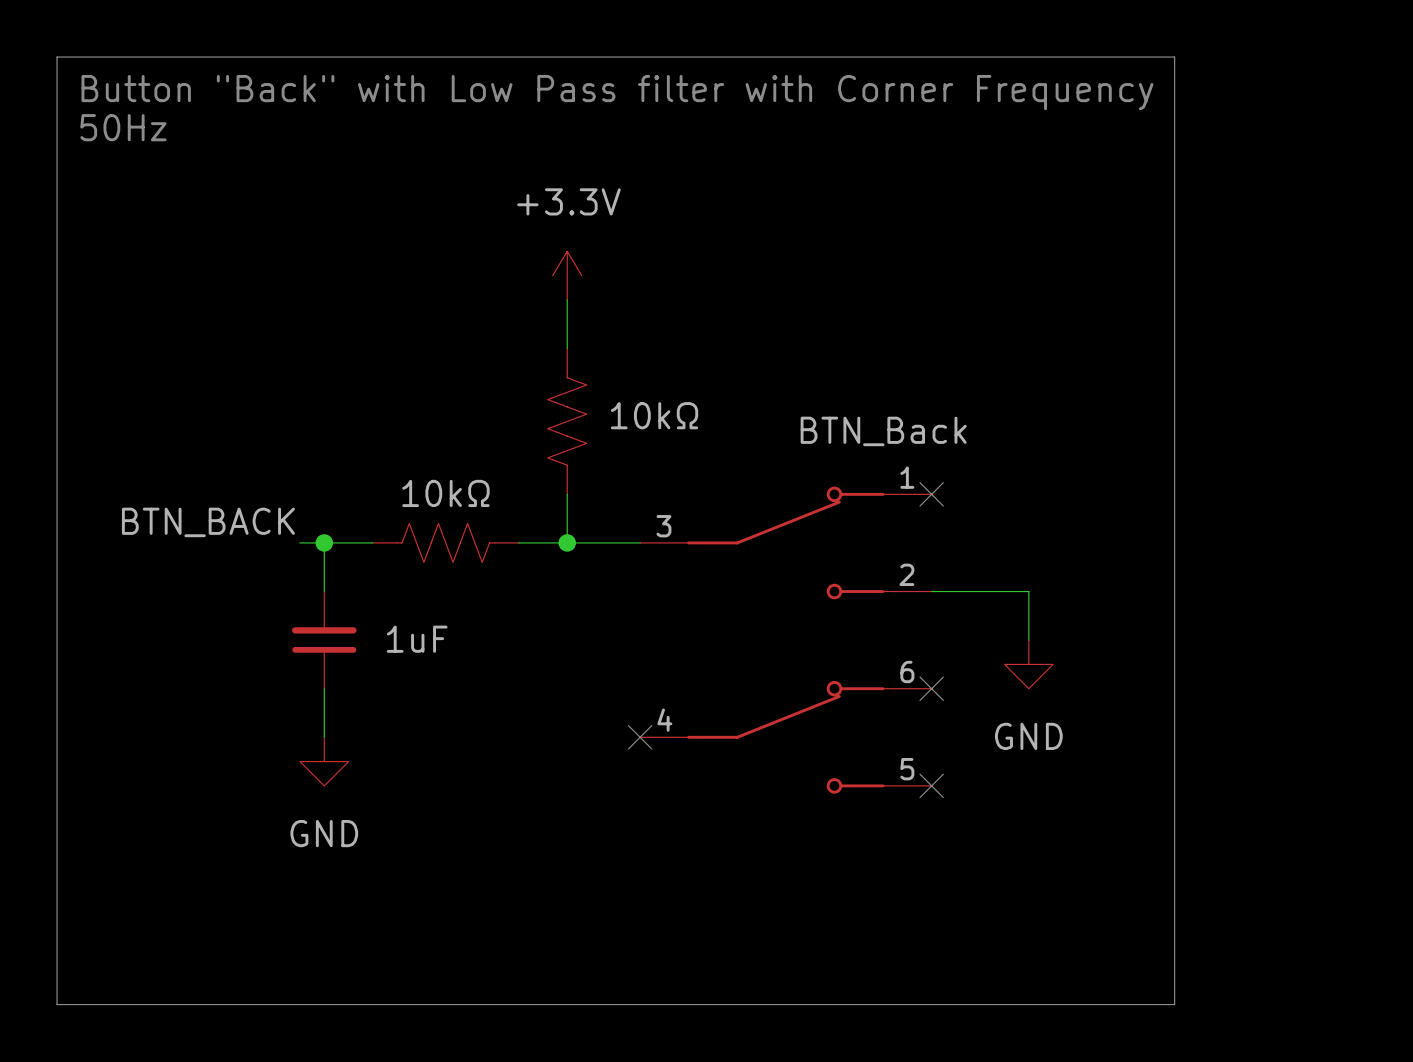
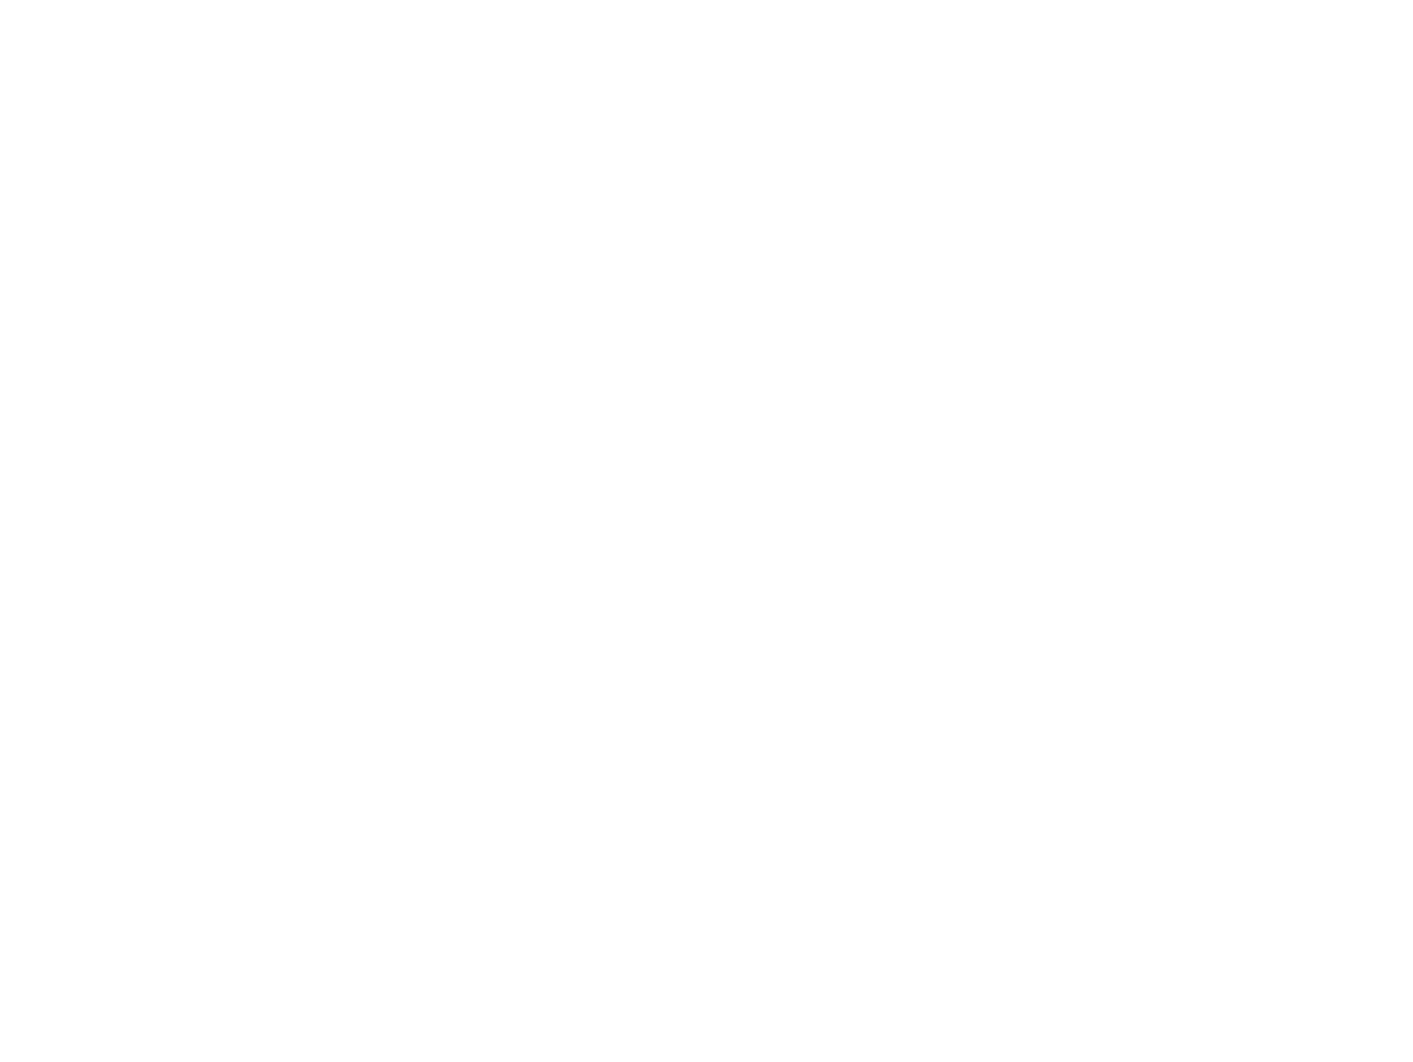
line: (57, 57) (1174, 57) (1174, 1004) (57, 1004) (57, 57) -> none
text: Button "Back" with Low Pass filter with Corner Frequency (617, 92) -> none
text: 50Hz (123, 127) -> none
power symbol: +3.3V (567, 275) -> none
wire: (567, 299) (567, 348) -> none
part: 10kΩ (567, 421) -> none
wire: (567, 494) (567, 542) -> none
no-connect mark: (931, 494) -> none
label: BTN_BACK (208, 522) -> none
wire: (299, 542) (372, 542) -> none
wire: (324, 542) (324, 591) -> none
junction: (324, 542) -> none
part: 10kΩ (445, 542) -> none
wire: (518, 542) (640, 542) -> none
junction: (567, 542) -> none
wire: (931, 591) (1028, 591) (1028, 640) -> none
part: 1uF (324, 640) -> none
part: BTN_Back (785, 640) -> none
power symbol: GND (1028, 664) -> none
wire: (324, 688) (324, 737) -> none
no-connect mark: (931, 688) -> none
no-connect mark: (640, 737) -> none
power symbol: GND (324, 761) -> none
no-connect mark: (931, 785) -> none

